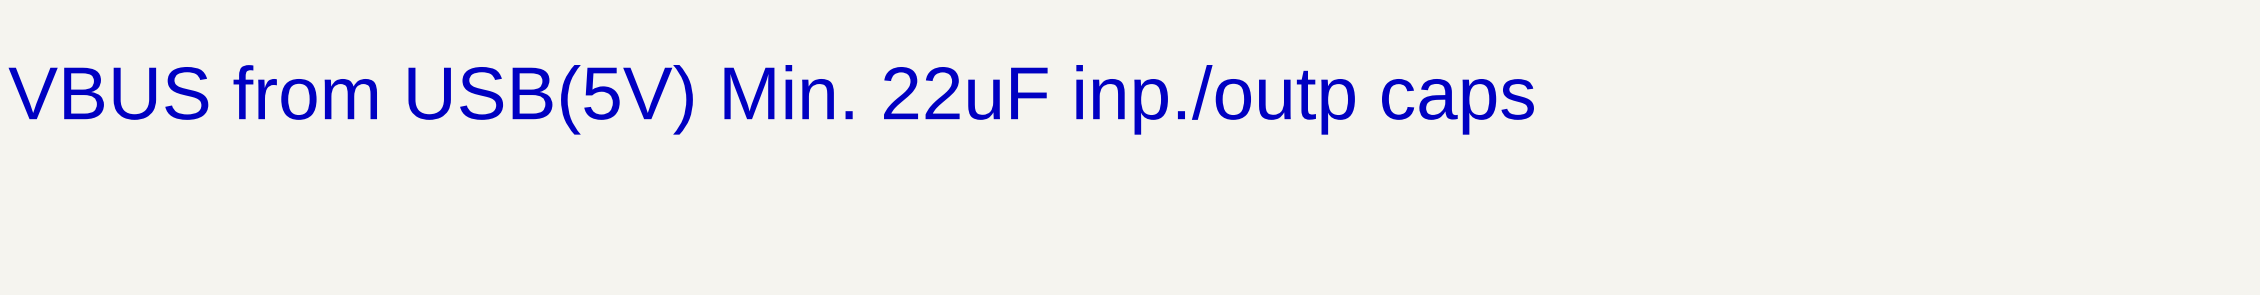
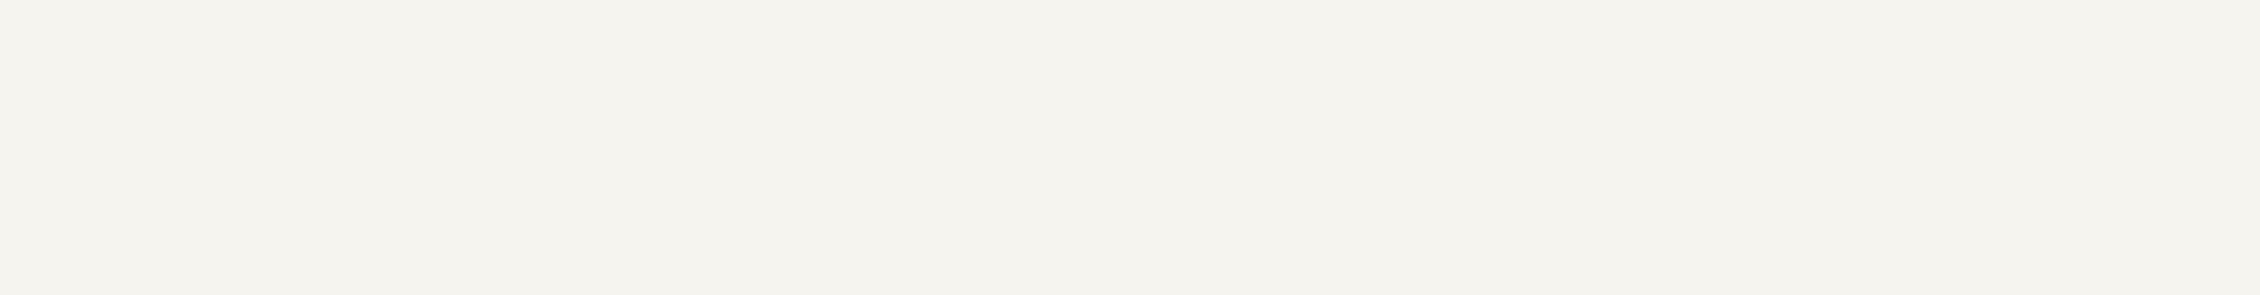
text: VBUS from USB(5V) Min. 22uF inp./outp caps (771, 99) -> none

